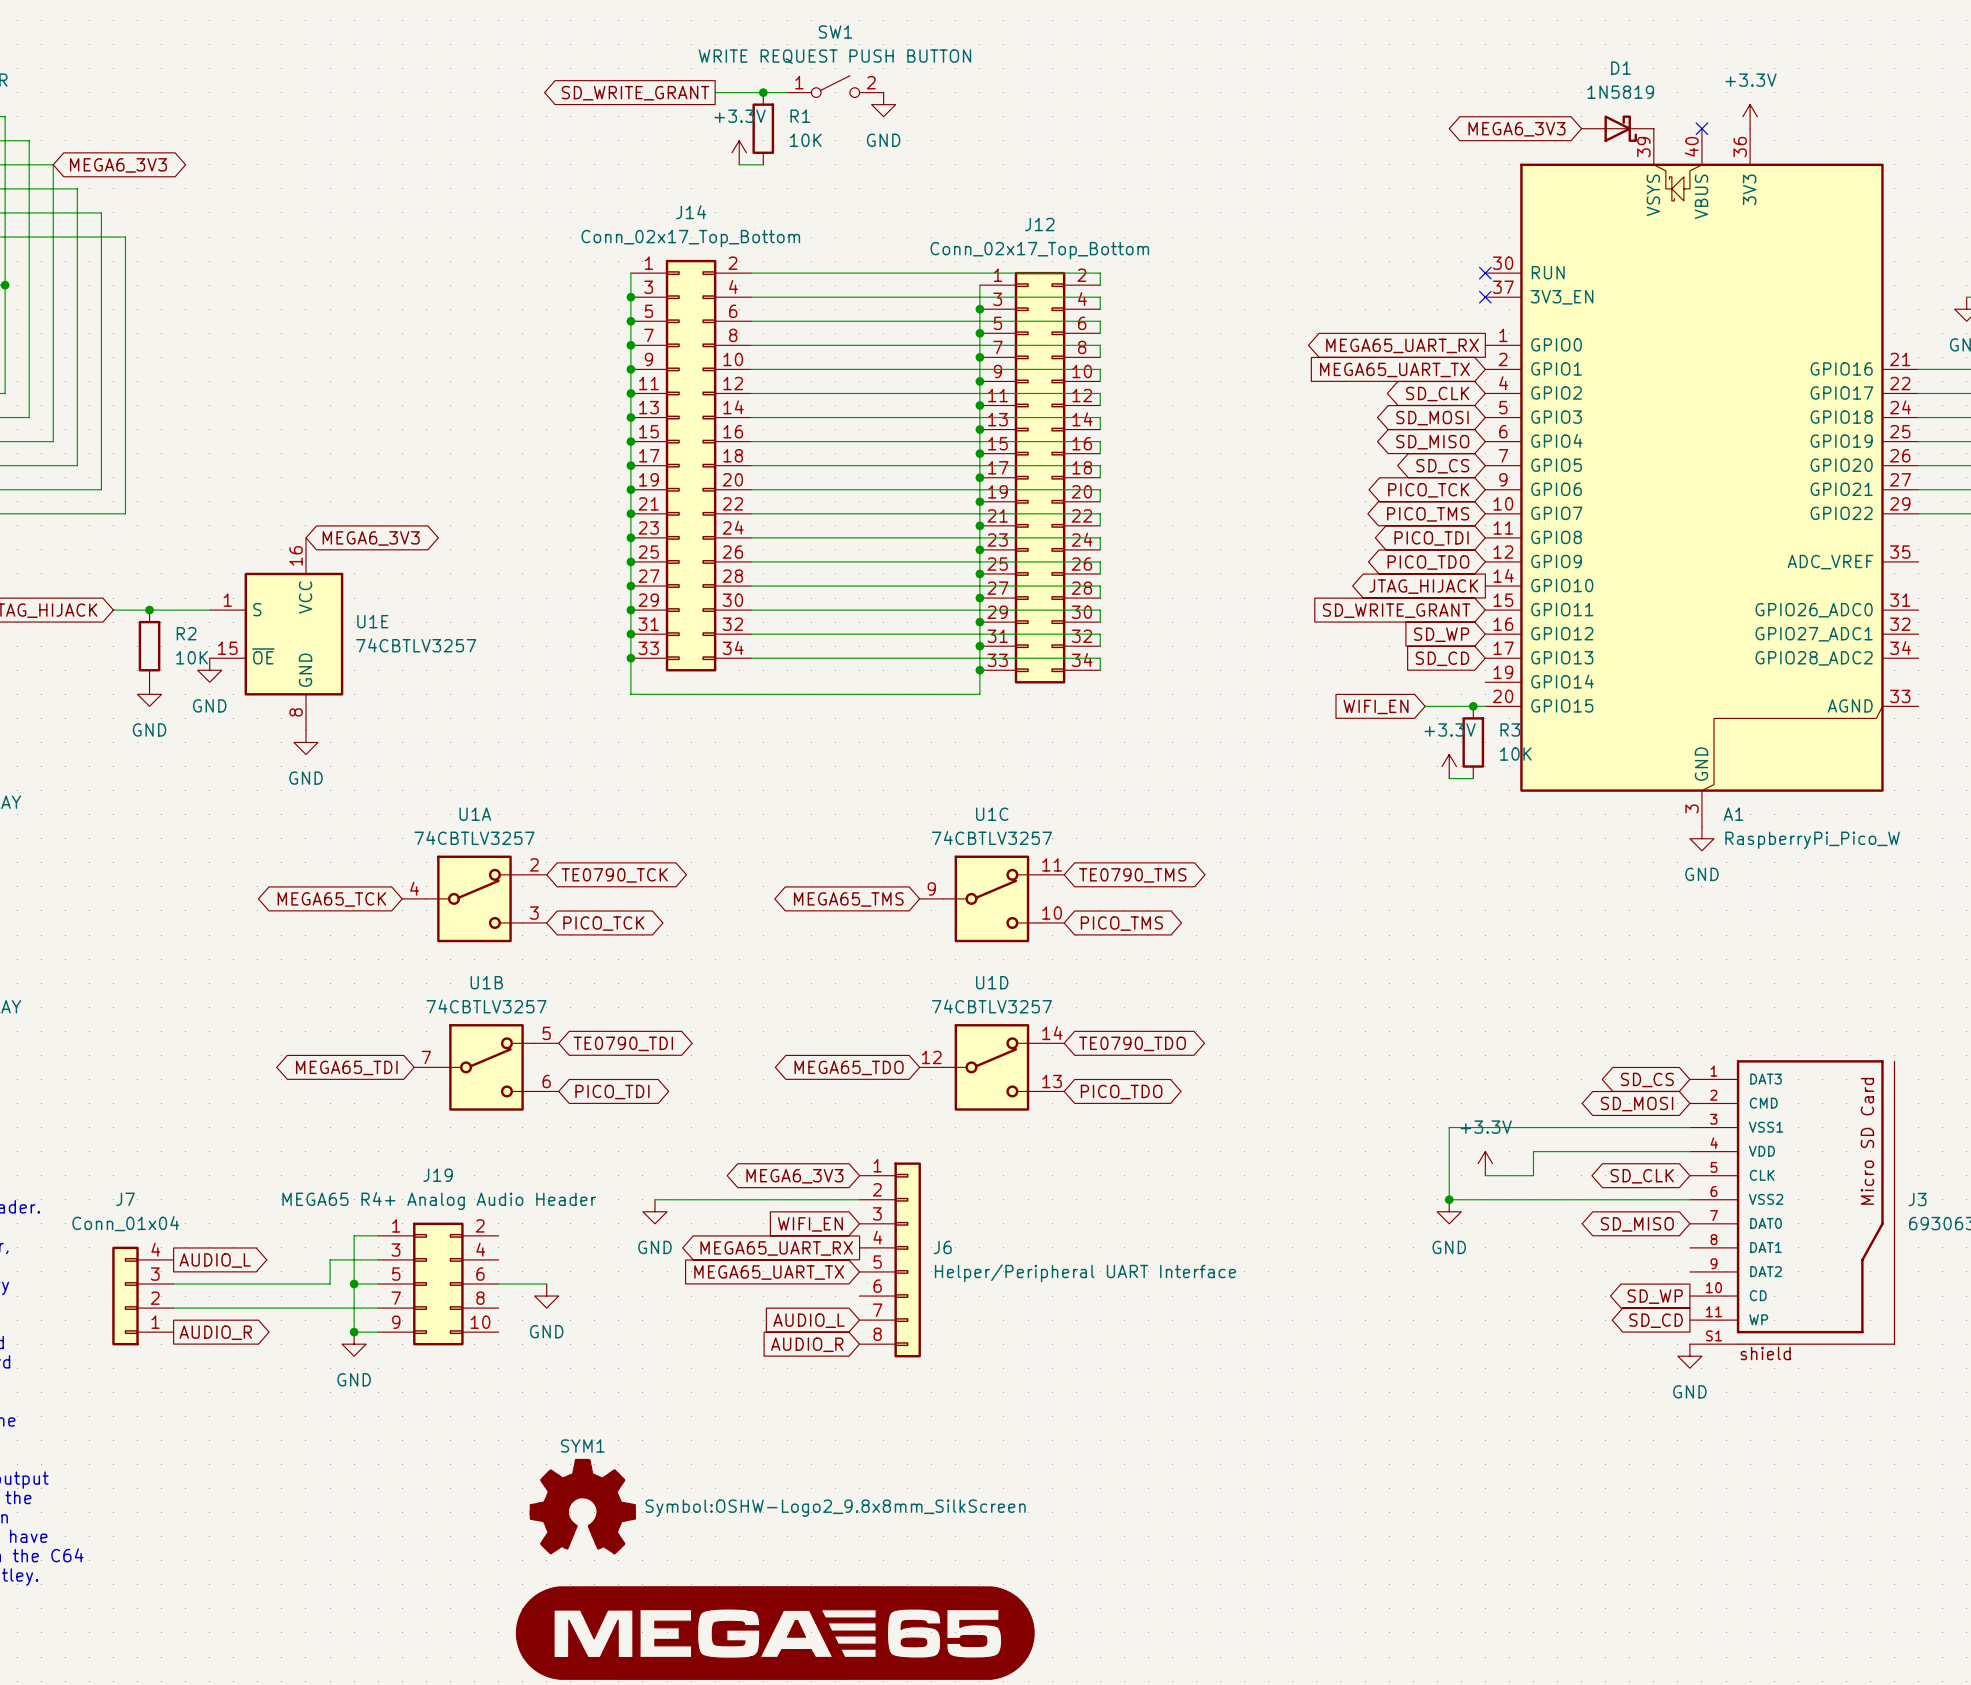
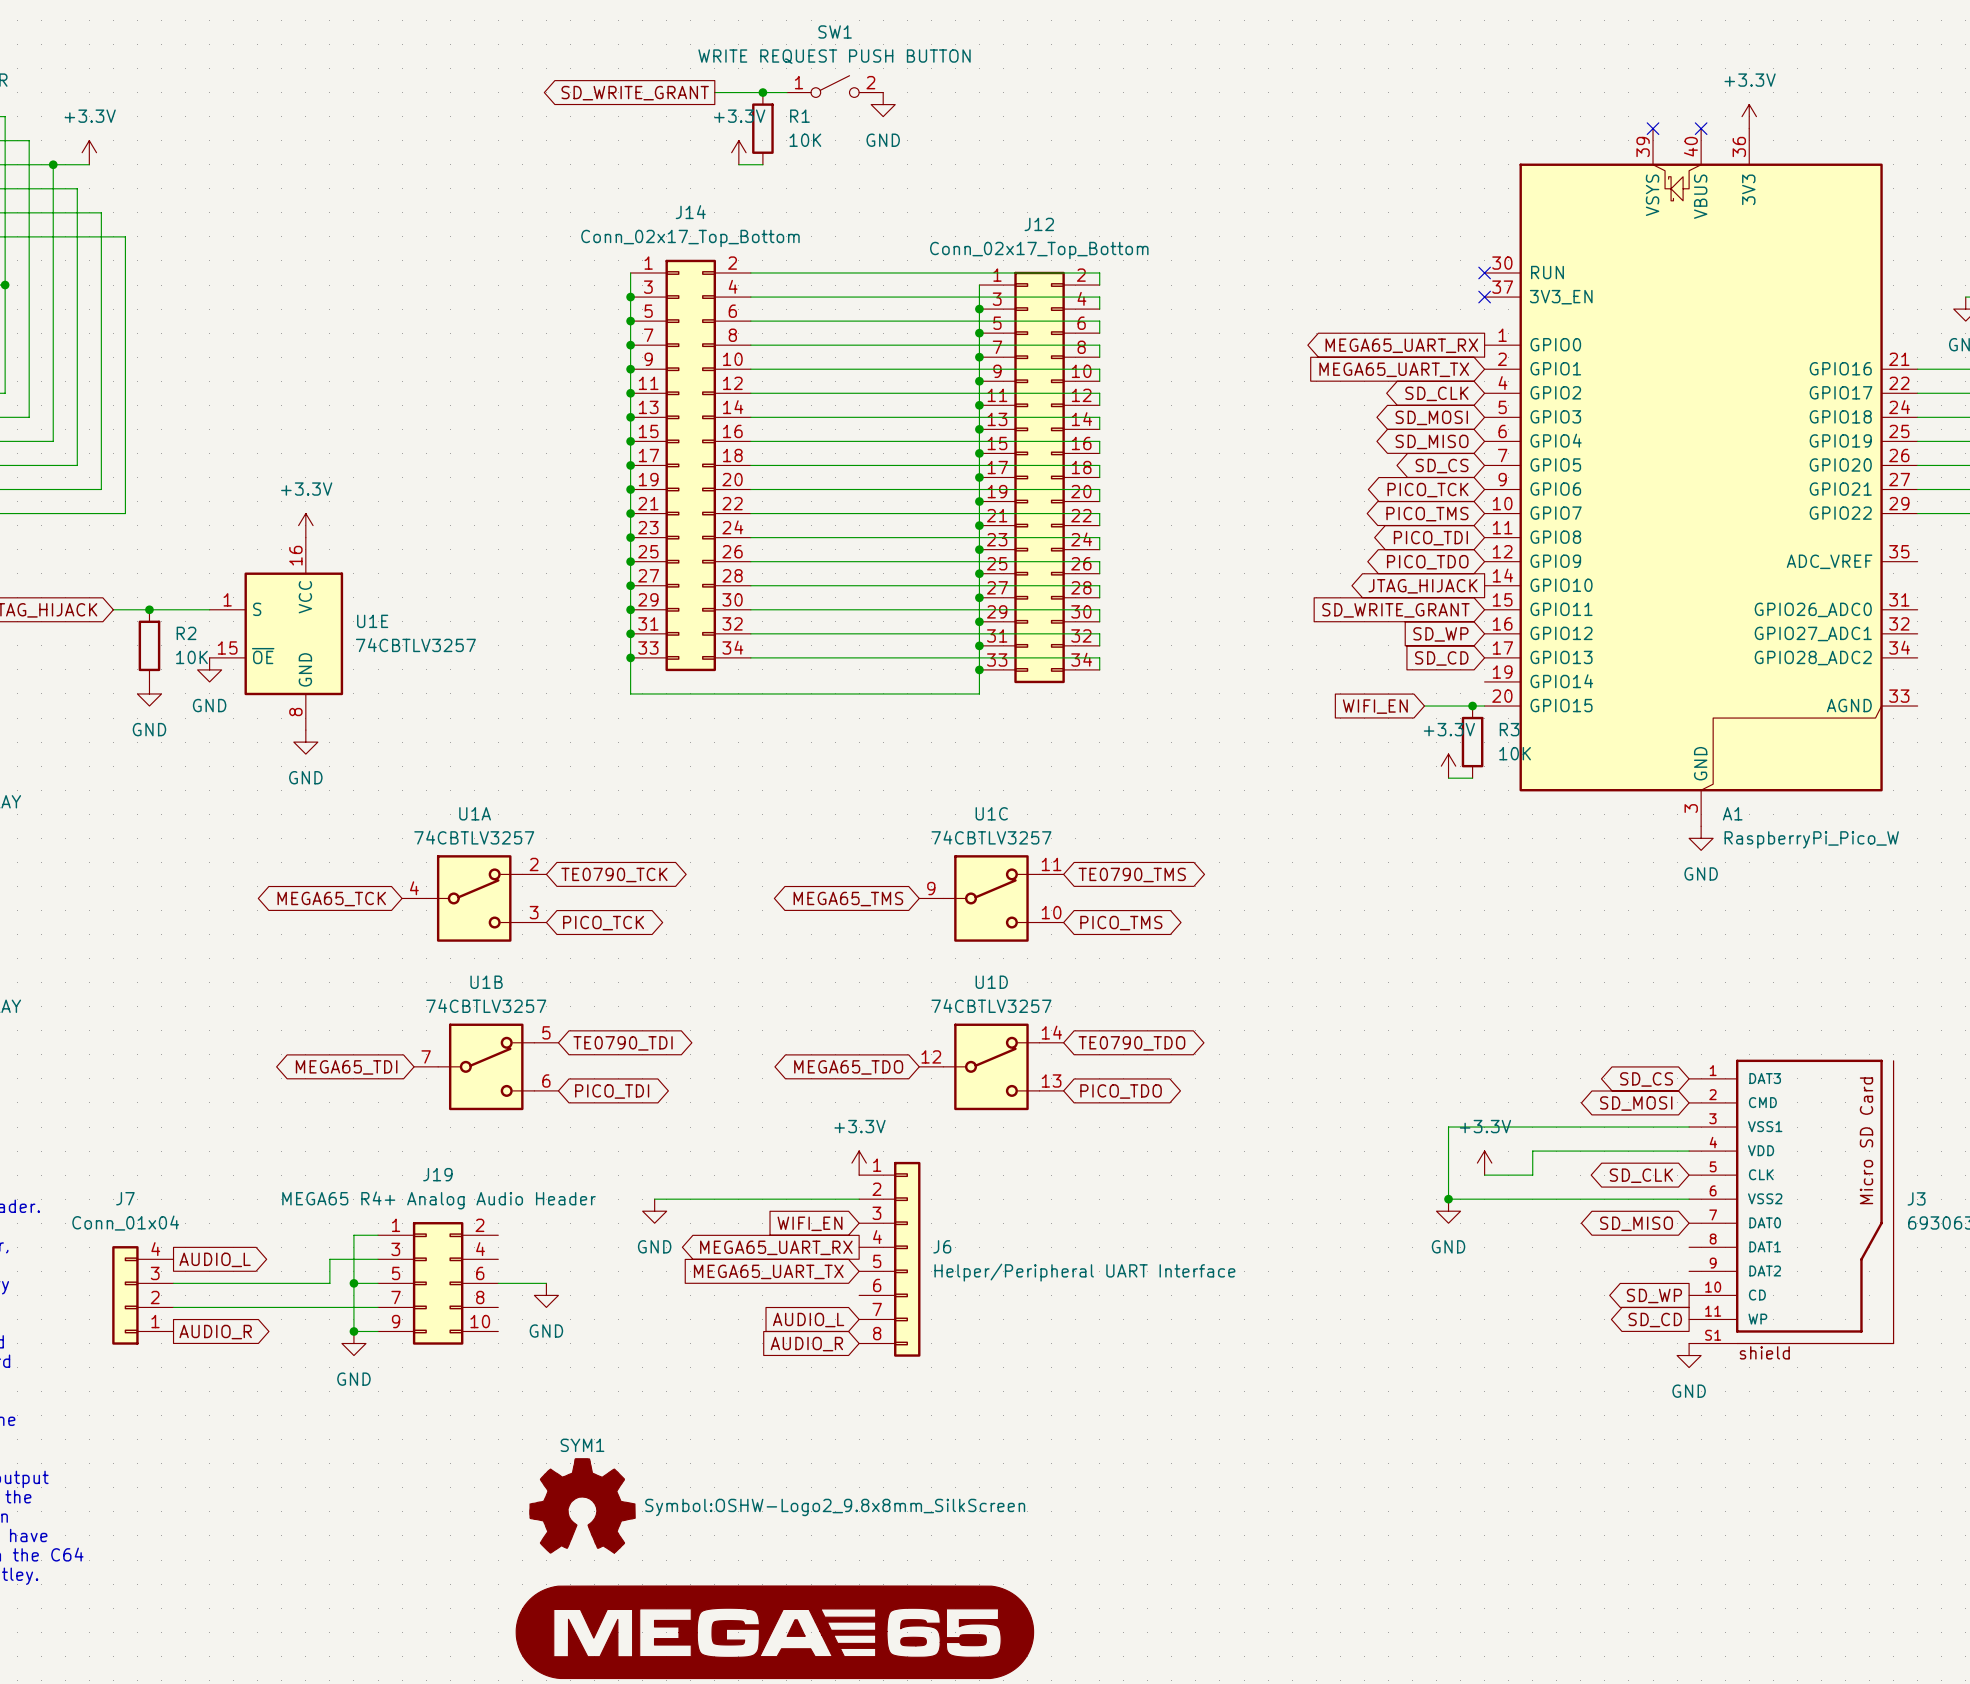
D1: 1N5819 (1617, 128) -> none
no-connect mark: none -> (1653, 128)
global label: MEGA6_3V3 (1516, 129) -> none
power symbol: none -> +3.3V (89, 152)
wire: none -> (53, 164) (89, 164)
junction: none -> (53, 164)
global label: MEGA6_3V3 (118, 165) -> none
power symbol: none -> +3.3V (305, 525)
global label: MEGA6_3V3 (371, 538) -> none
power symbol: none -> +3.3V (859, 1163)
global label: MEGA6_3V3 (794, 1176) -> none

